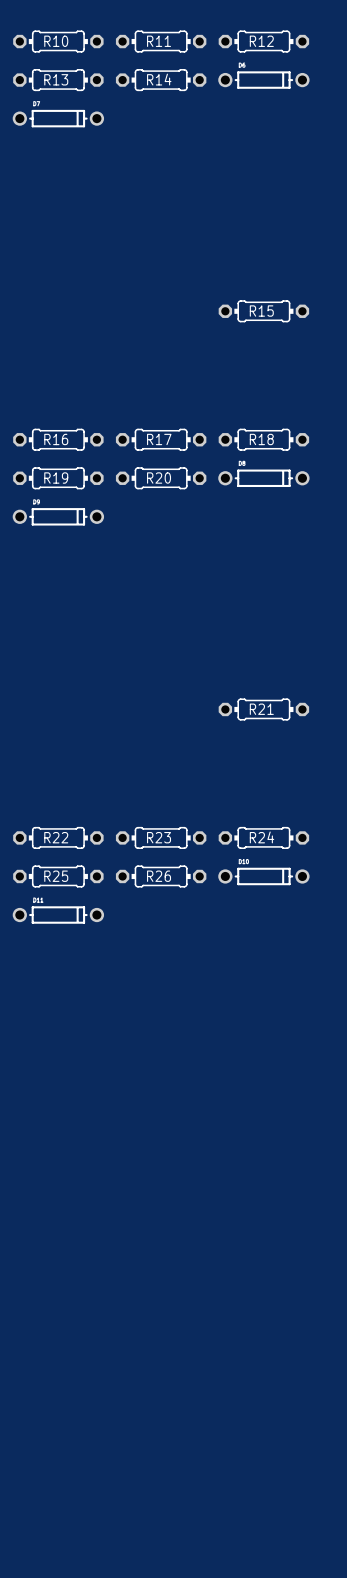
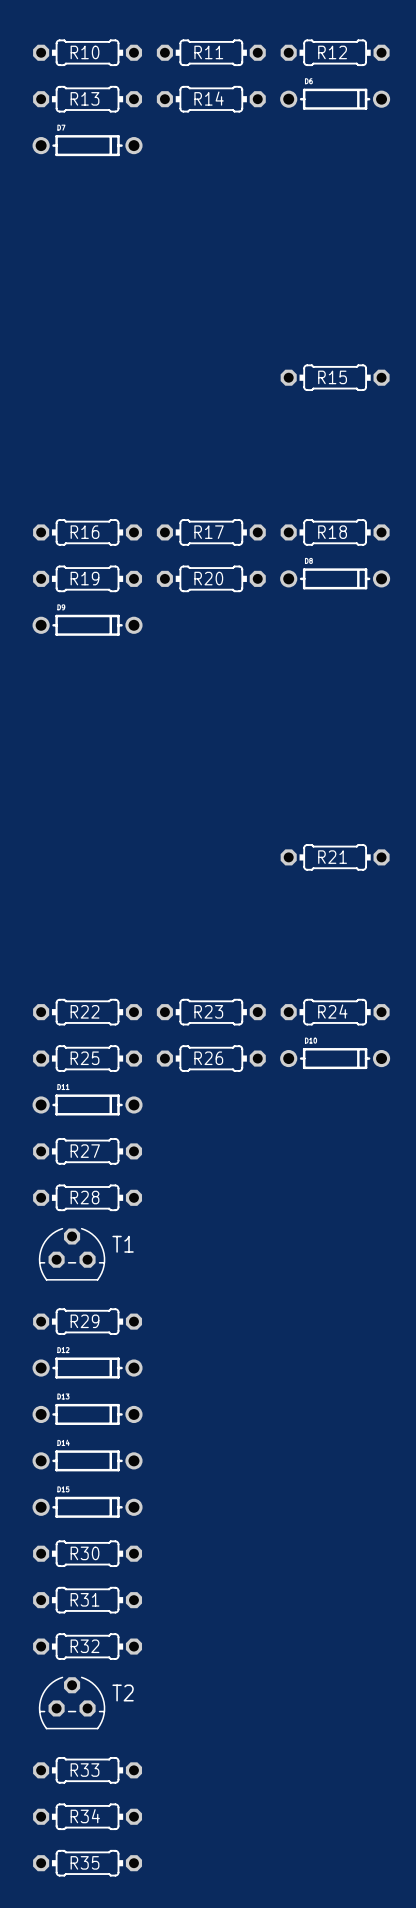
R27: none -> (87, 1151)
R28: none -> (87, 1197)
T1: none -> (72, 1254)
R29: none -> (87, 1321)
part: none -> (87, 1368)
part: none -> (87, 1414)
part: none -> (87, 1460)
part: none -> (87, 1507)
R30: none -> (87, 1553)
R31: none -> (87, 1600)
R32: none -> (87, 1646)
T2: none -> (72, 1702)
R33: none -> (87, 1770)
R34: none -> (87, 1816)
R35: none -> (87, 1863)

